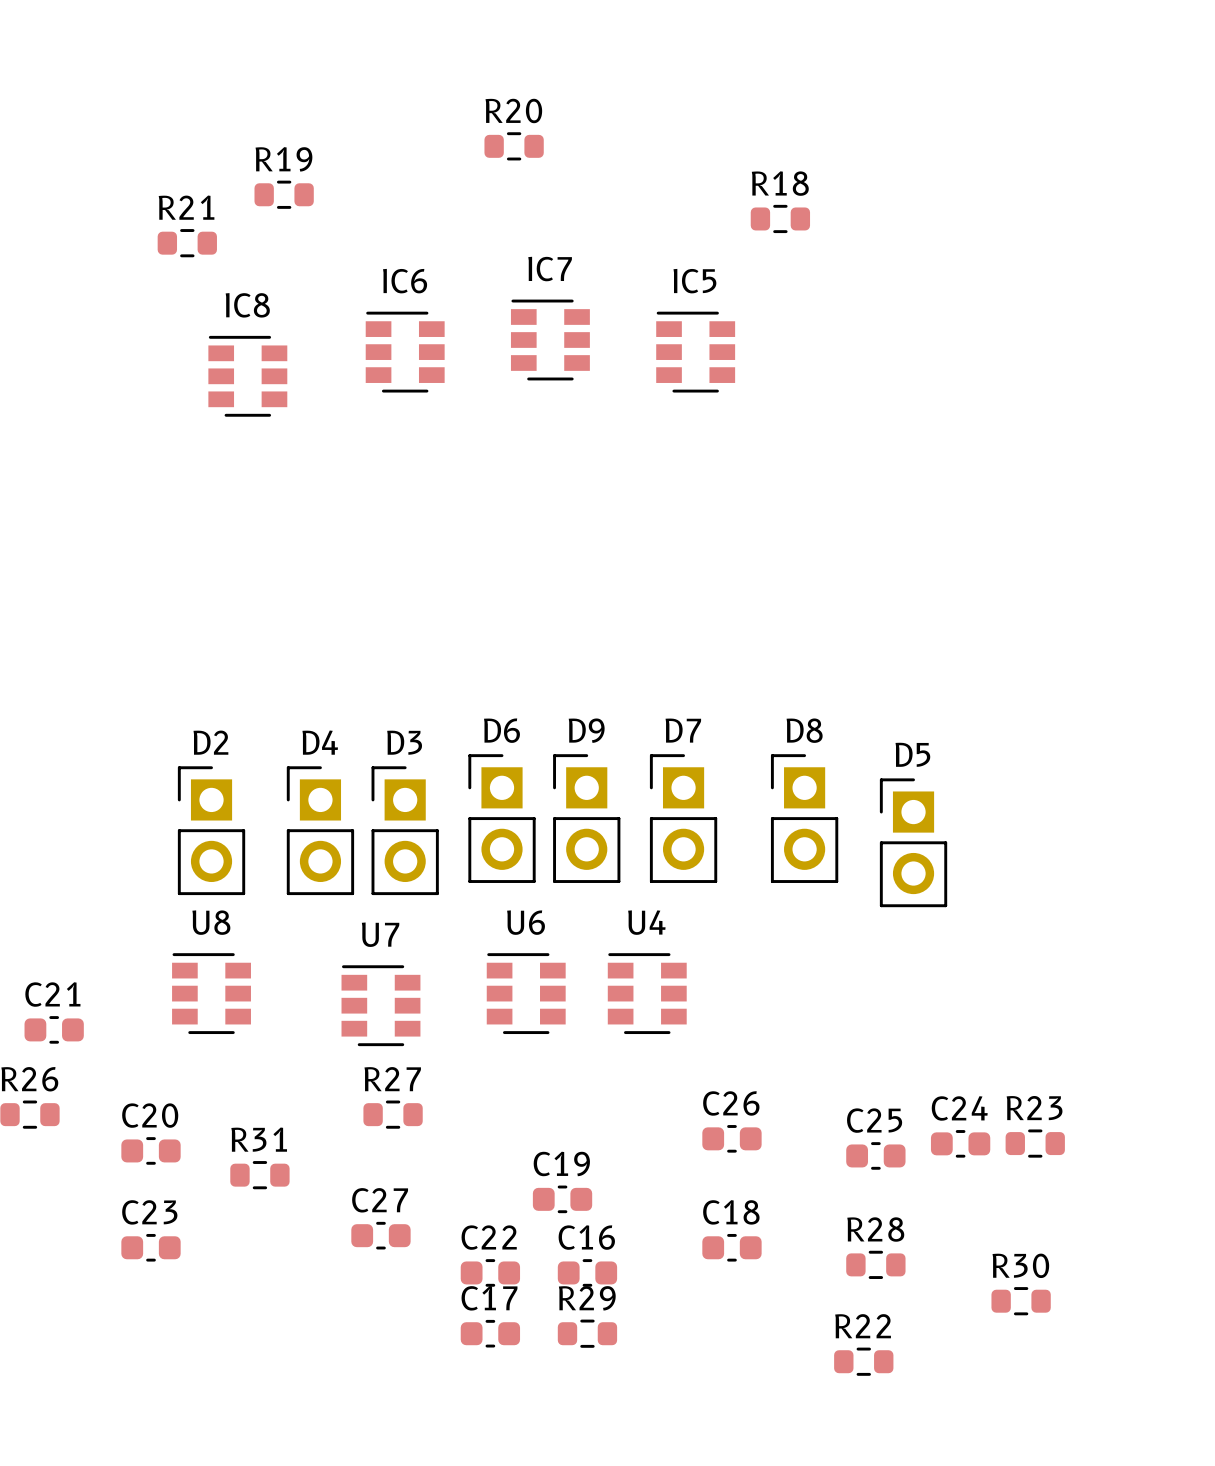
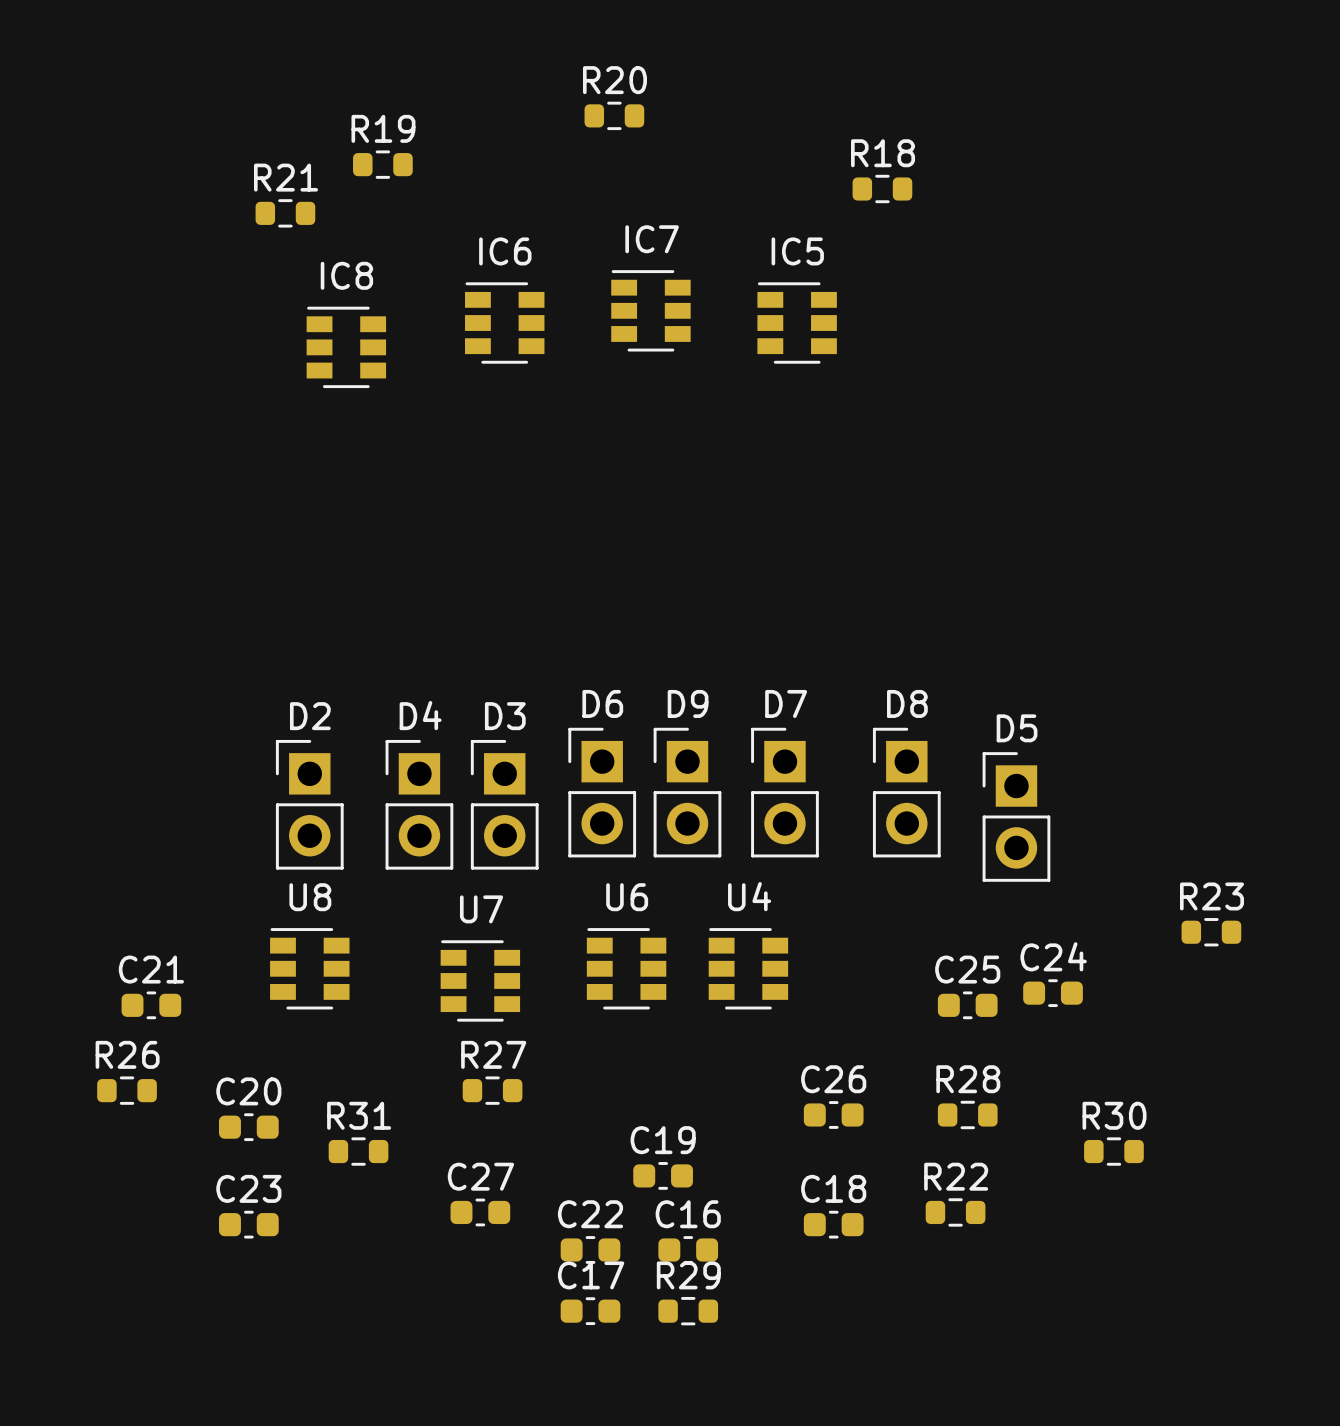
C24 position: (960, 1143) -> (1053, 993)
R23 position: (1035, 1143) -> (1211, 932)
C25 position: (875, 1155) -> (967, 1005)
R28 position: (875, 1264) -> (967, 1114)
R30 position: (1021, 1301) -> (1113, 1151)
R22 position: (863, 1361) -> (955, 1212)

